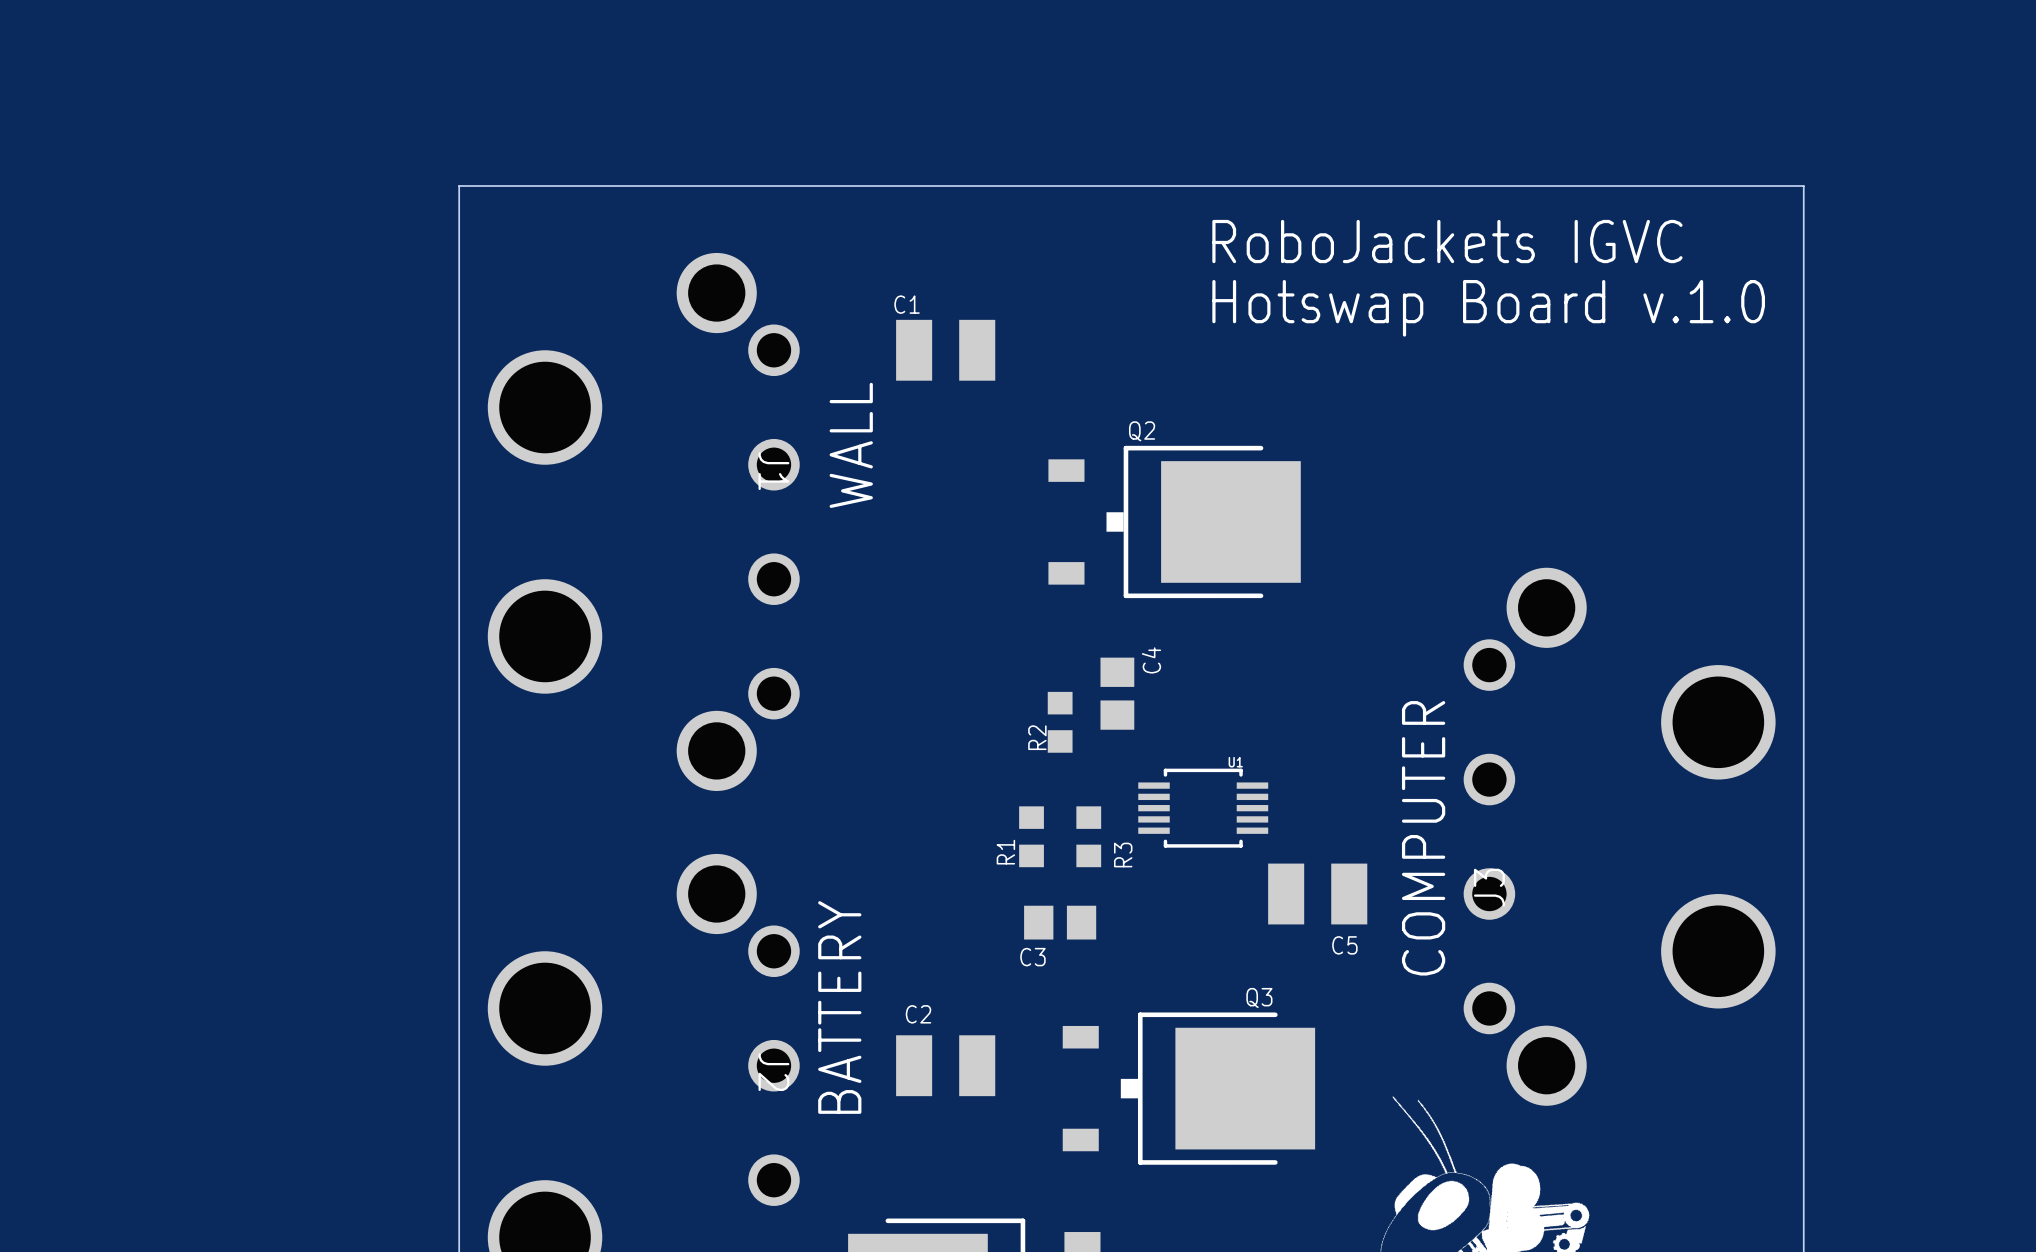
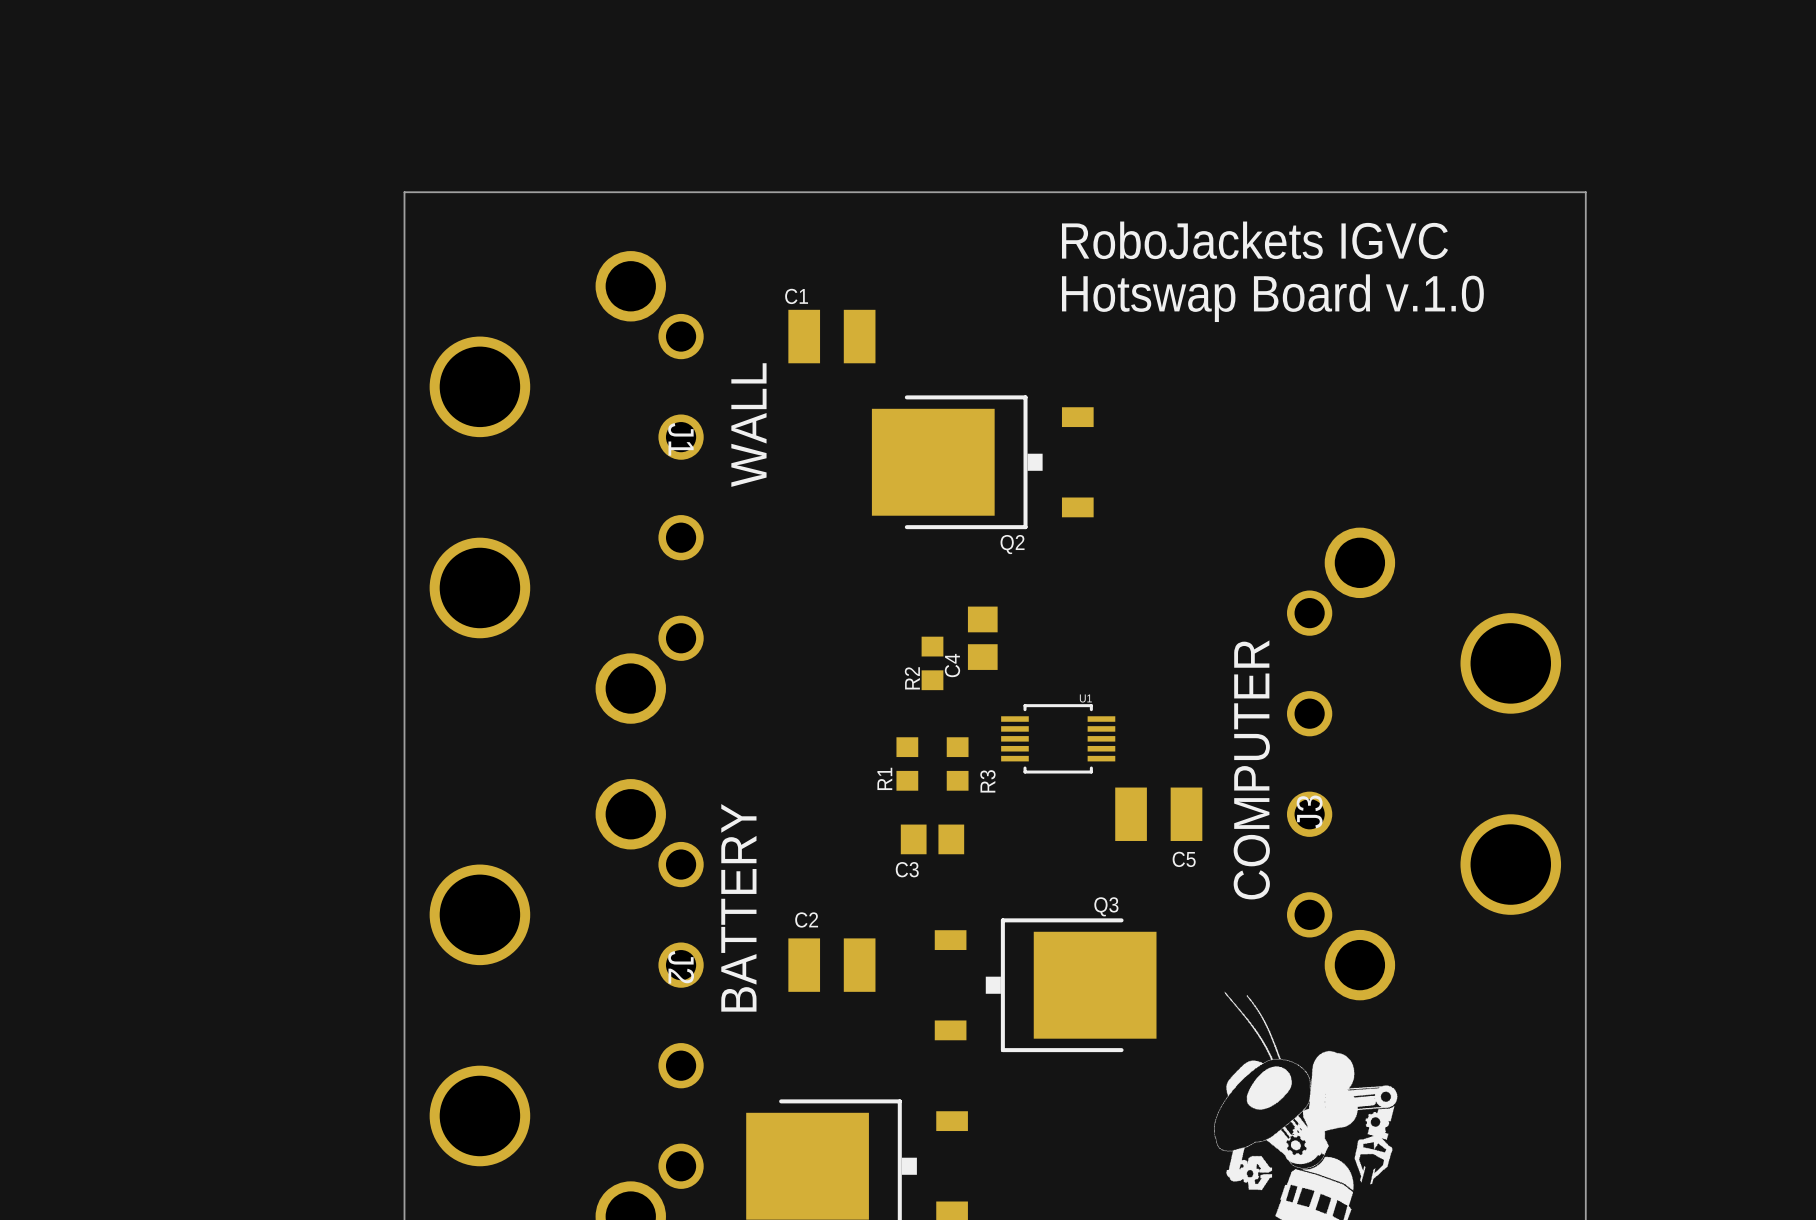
Q2 rotation: 0° (1174, 521) -> 180° (982, 462)
C4 name position: C4 (1151, 660) -> C4 (952, 665)

